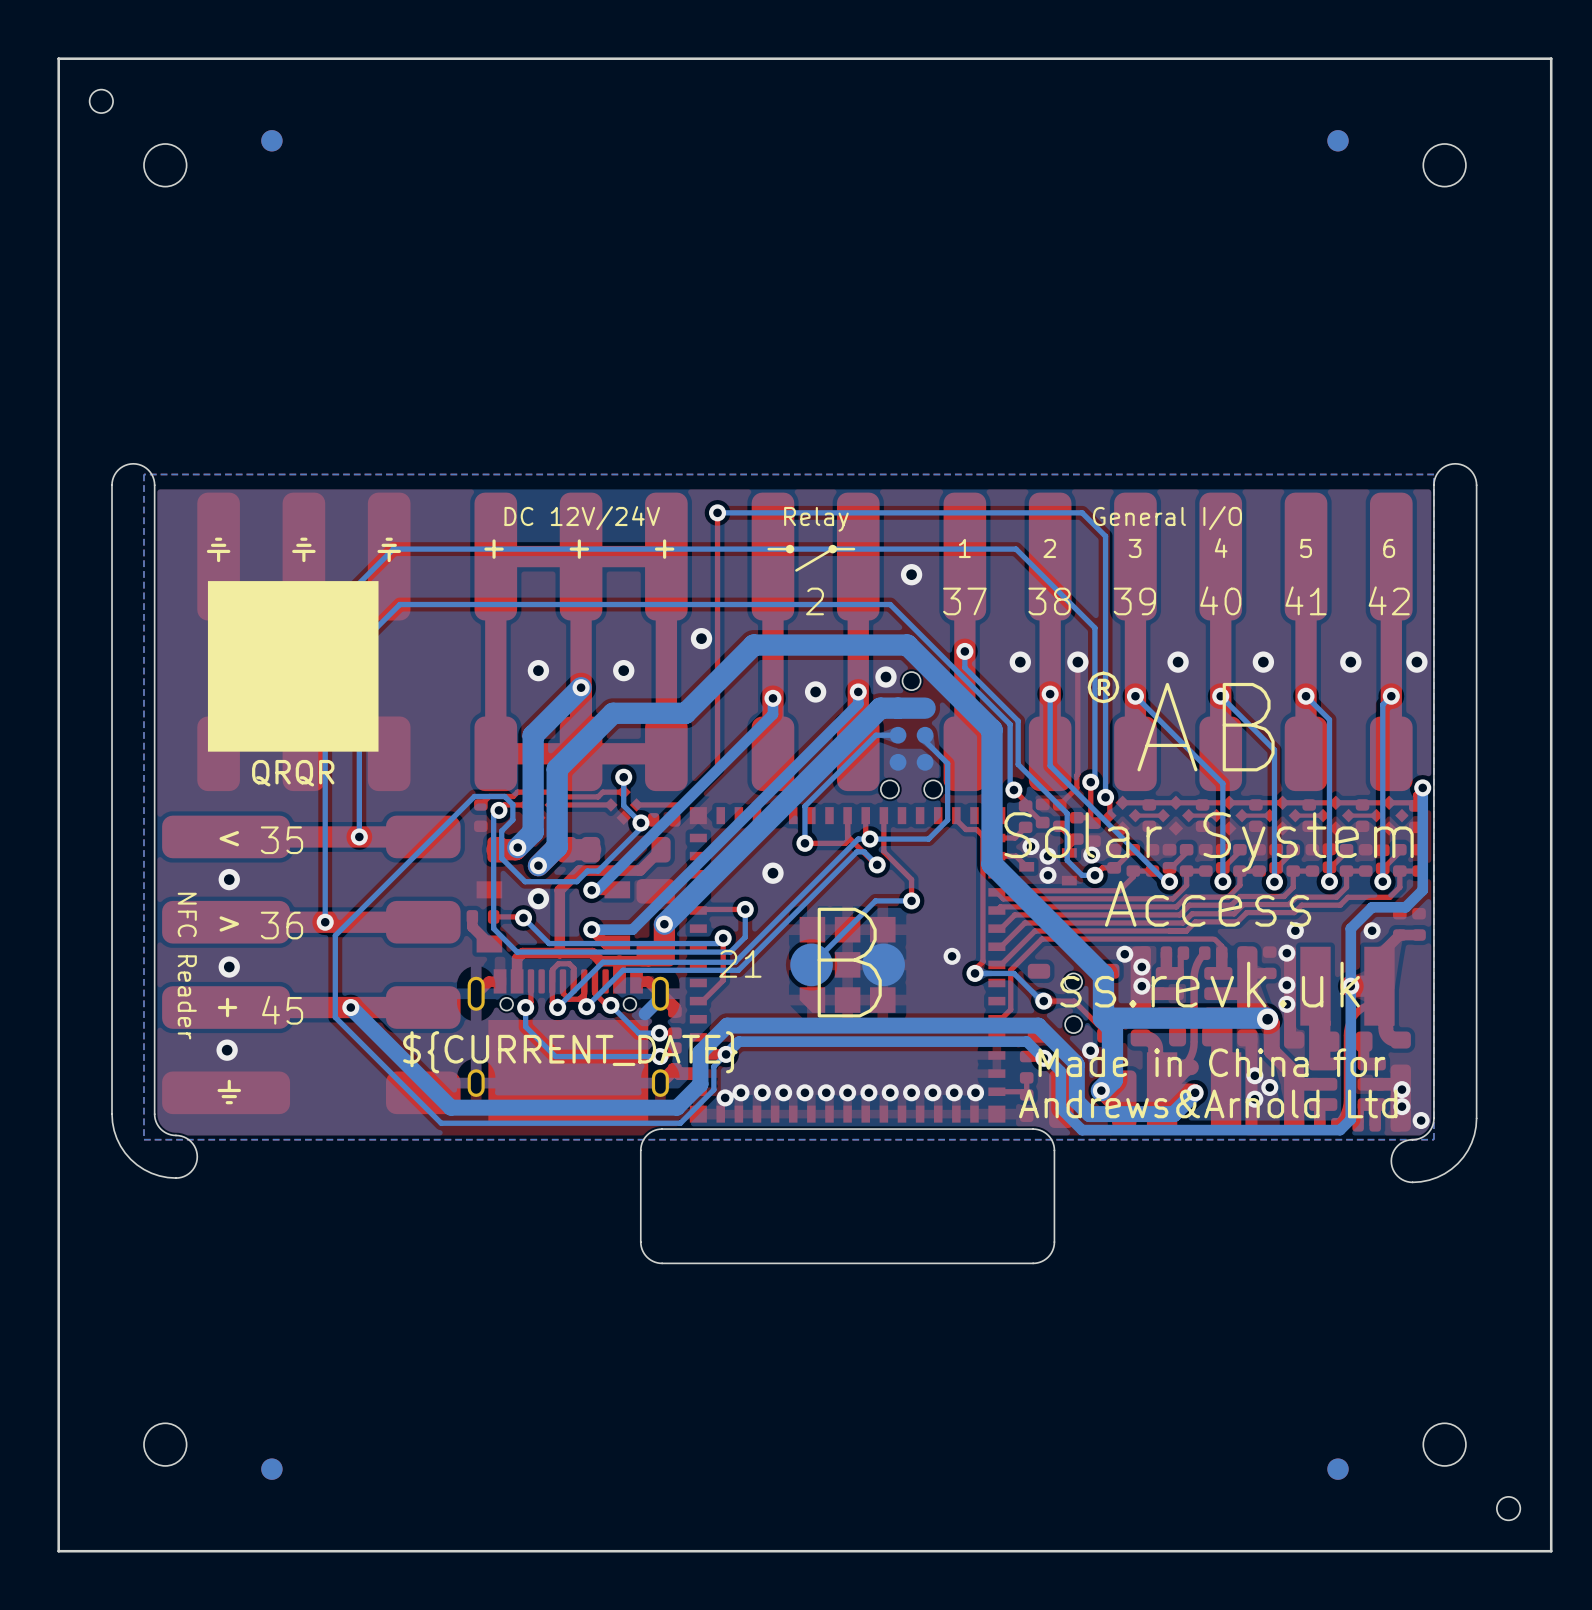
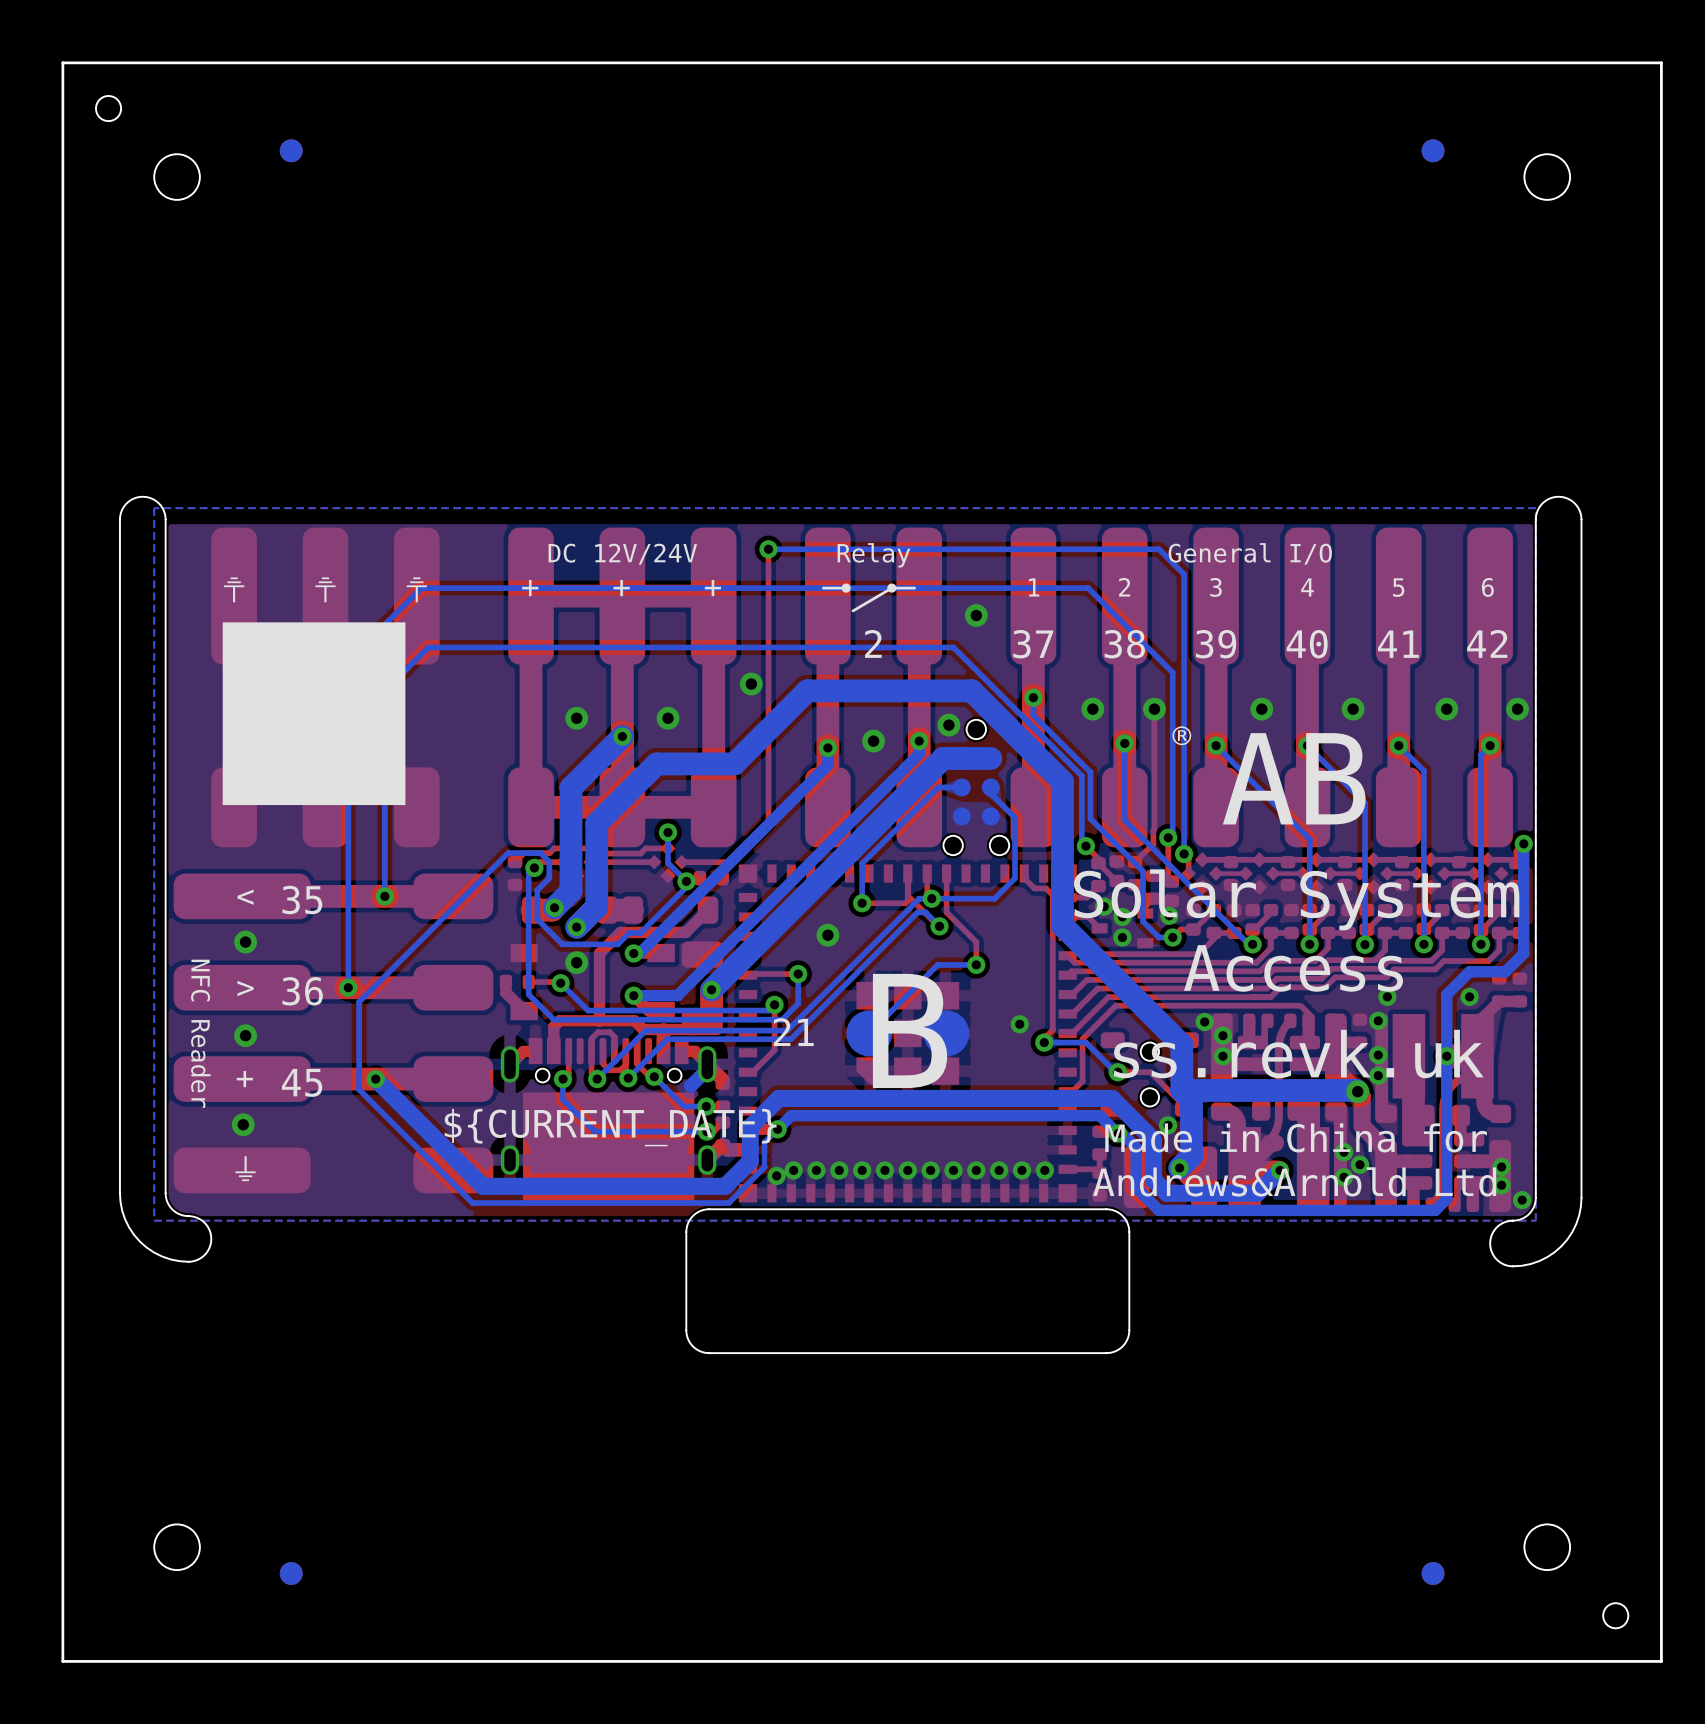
text: QRQR (293, 773) -> none

